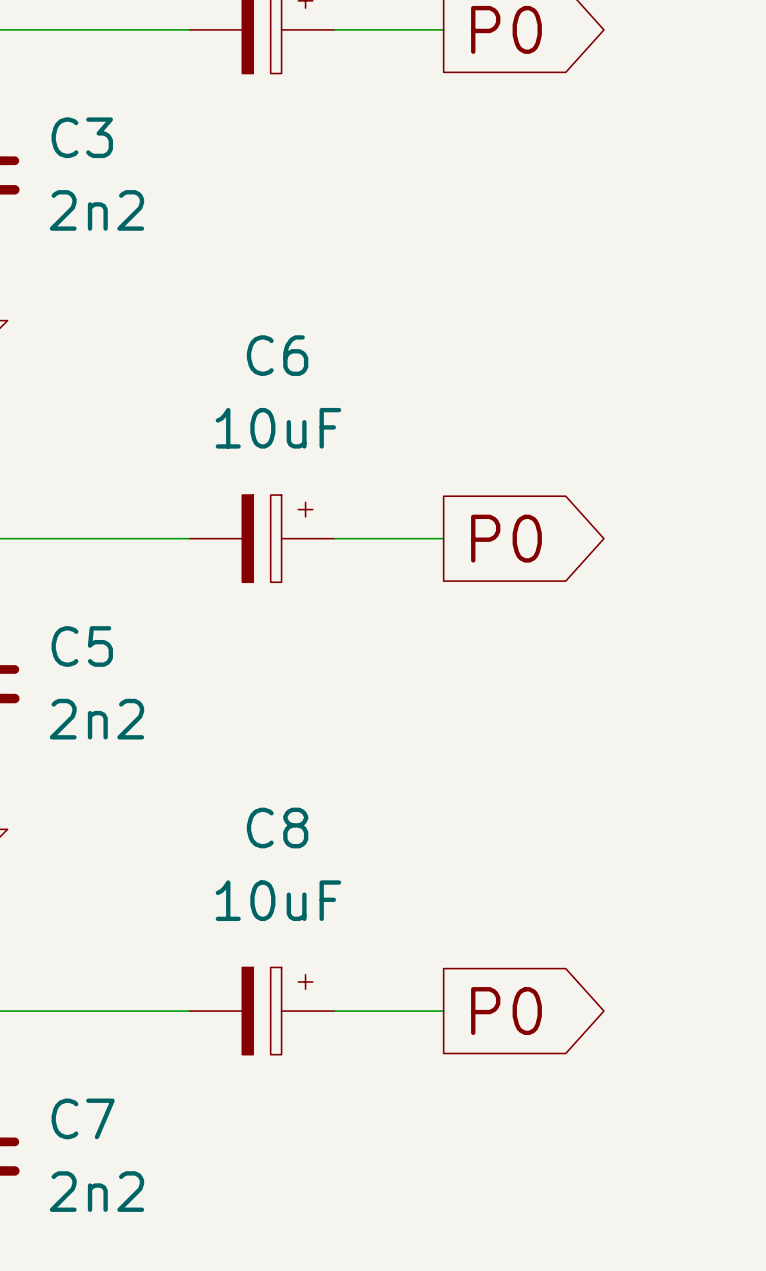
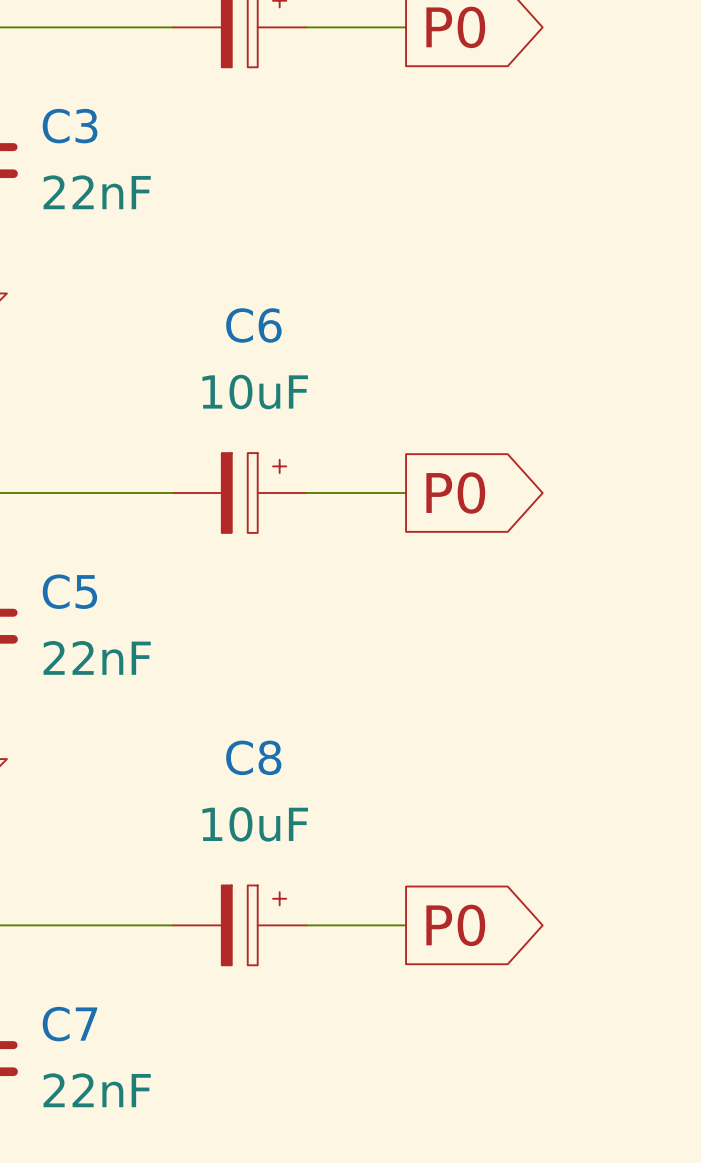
C3 value: 2n2 (96, 210) -> 22nF (97, 192)
C5 value: 2n2 (96, 719) -> 22nF (97, 657)
C7 value: 2n2 (96, 1191) -> 22nF (97, 1090)

